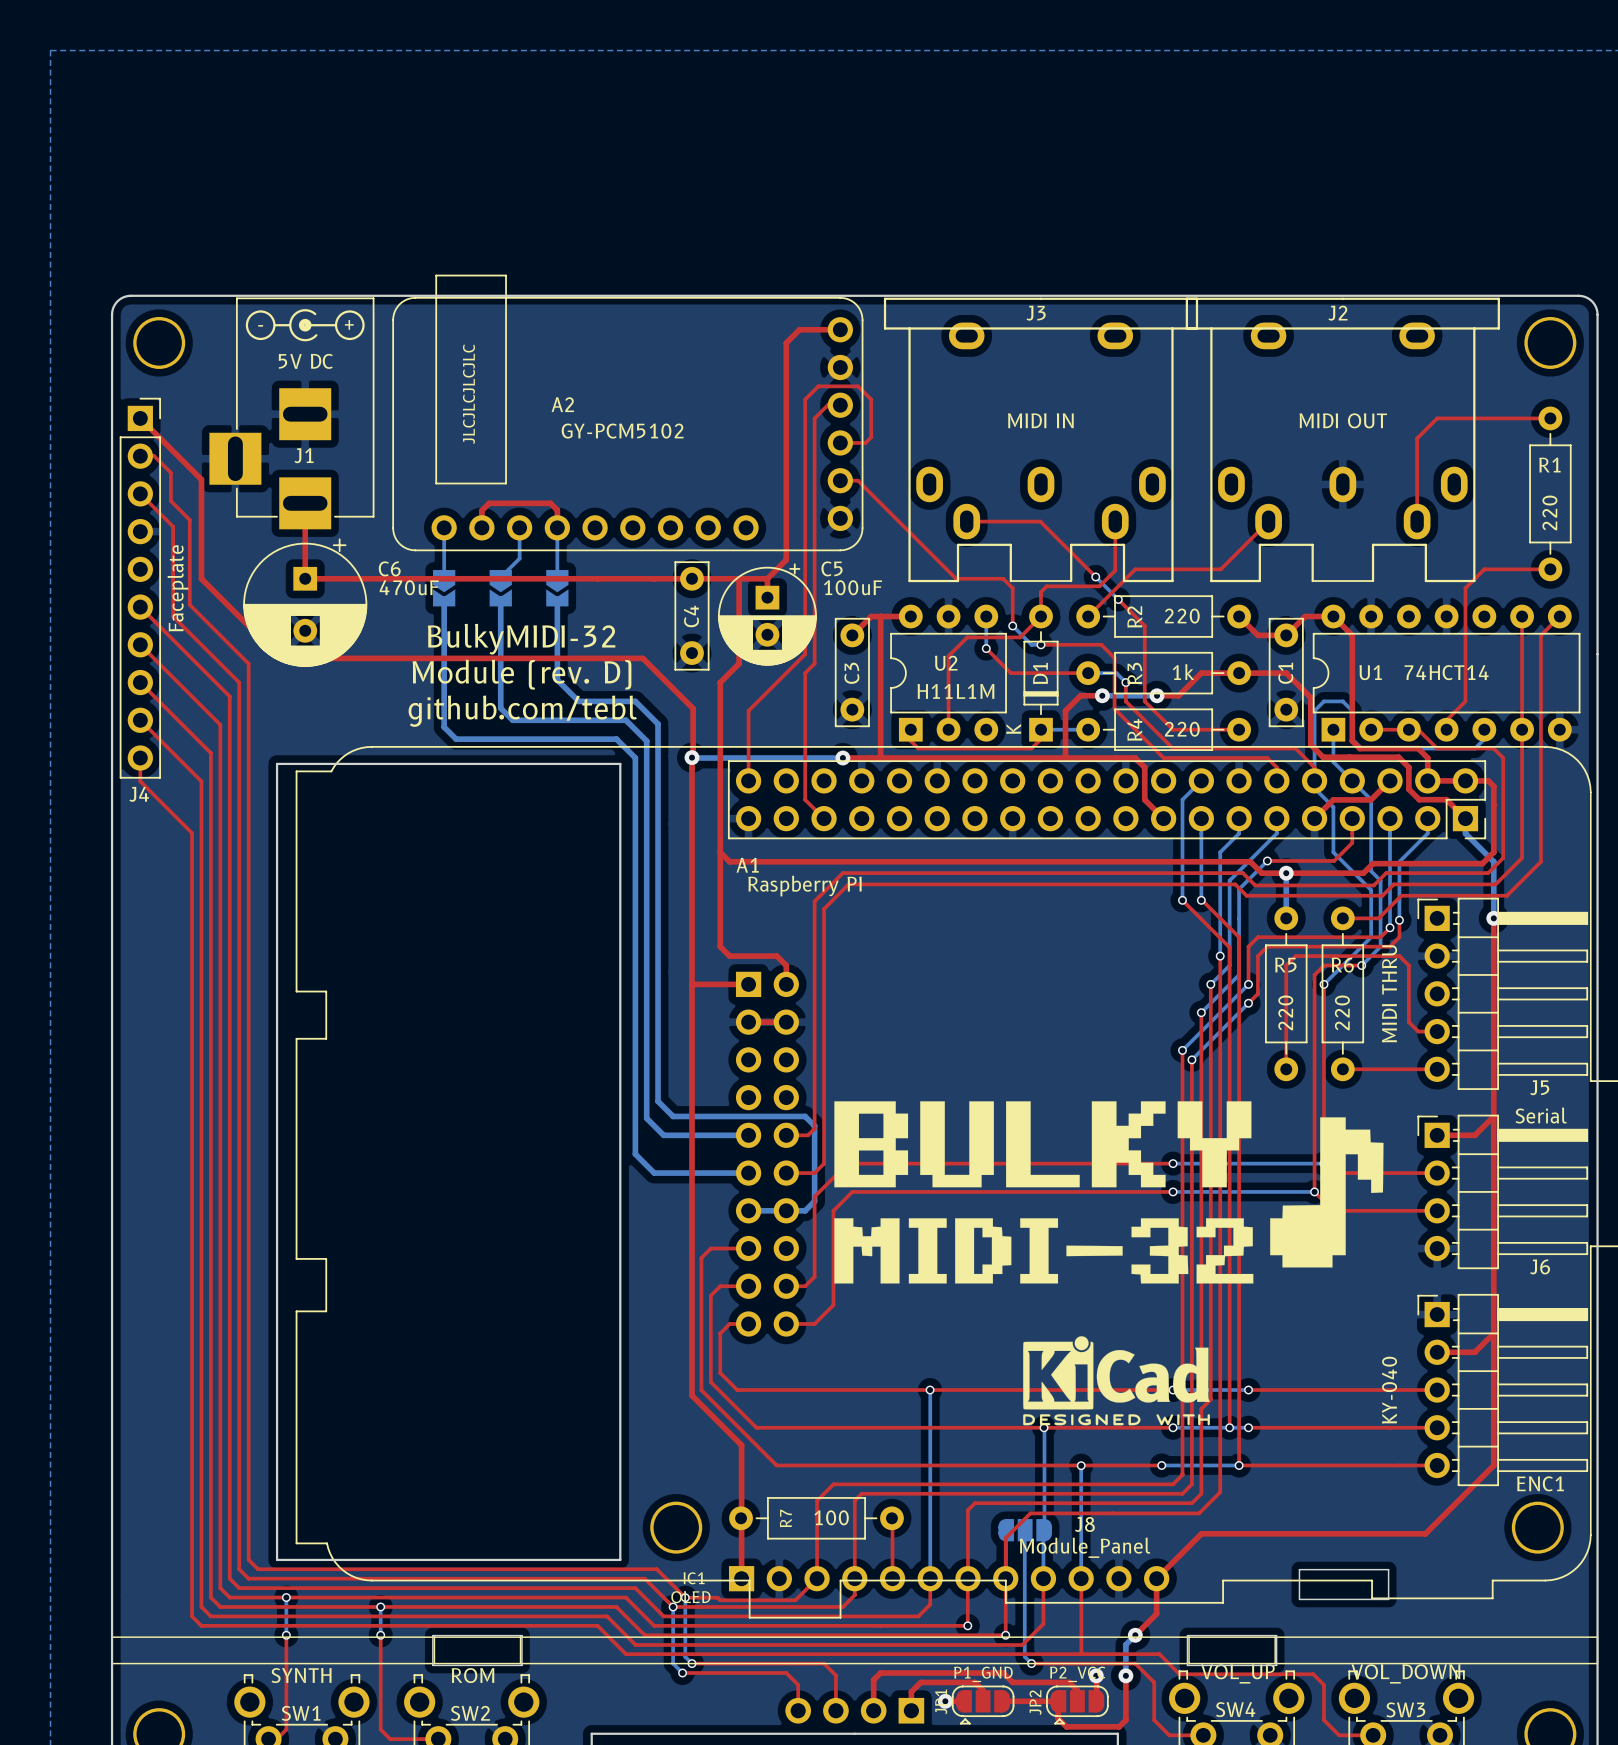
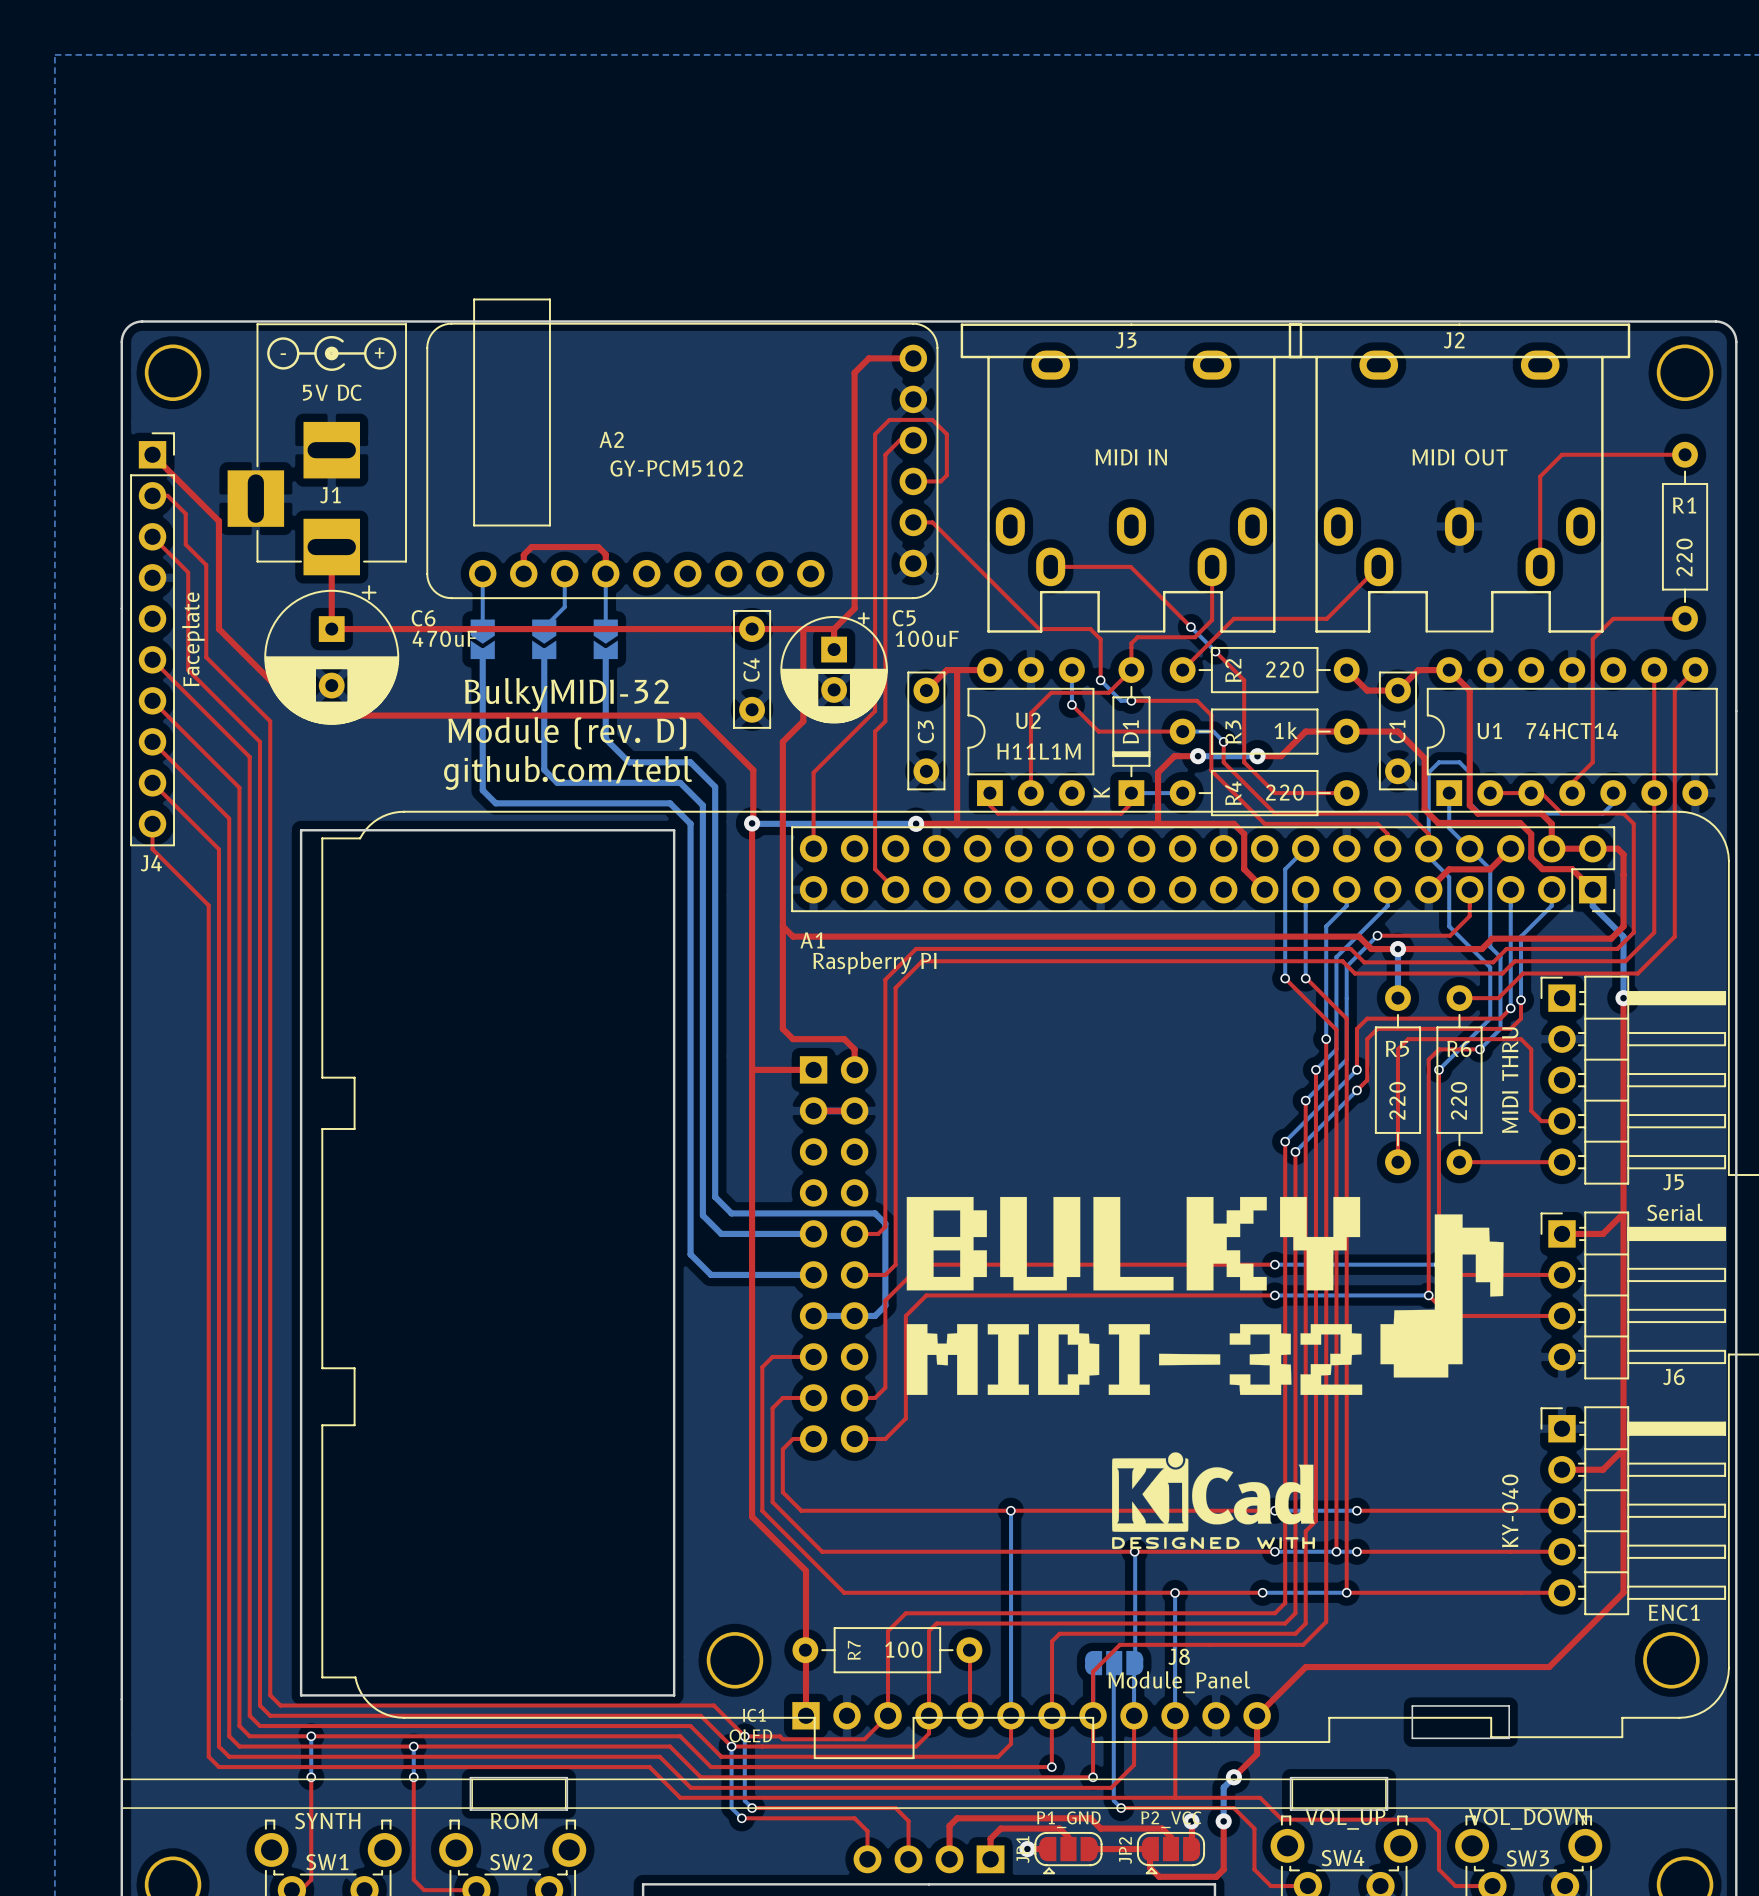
text: JLCJLCJLCJLC (468, 394) -> none

